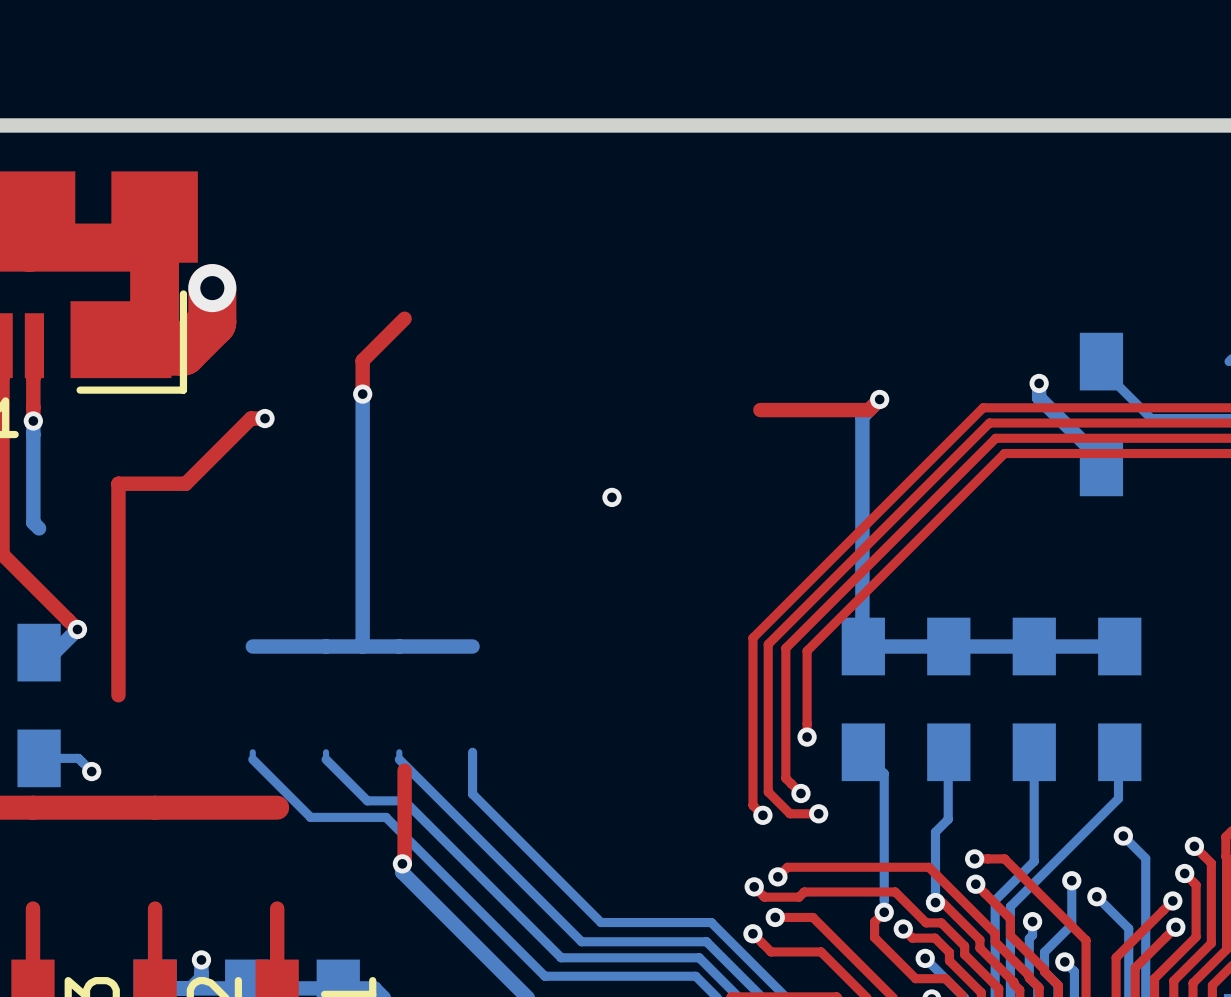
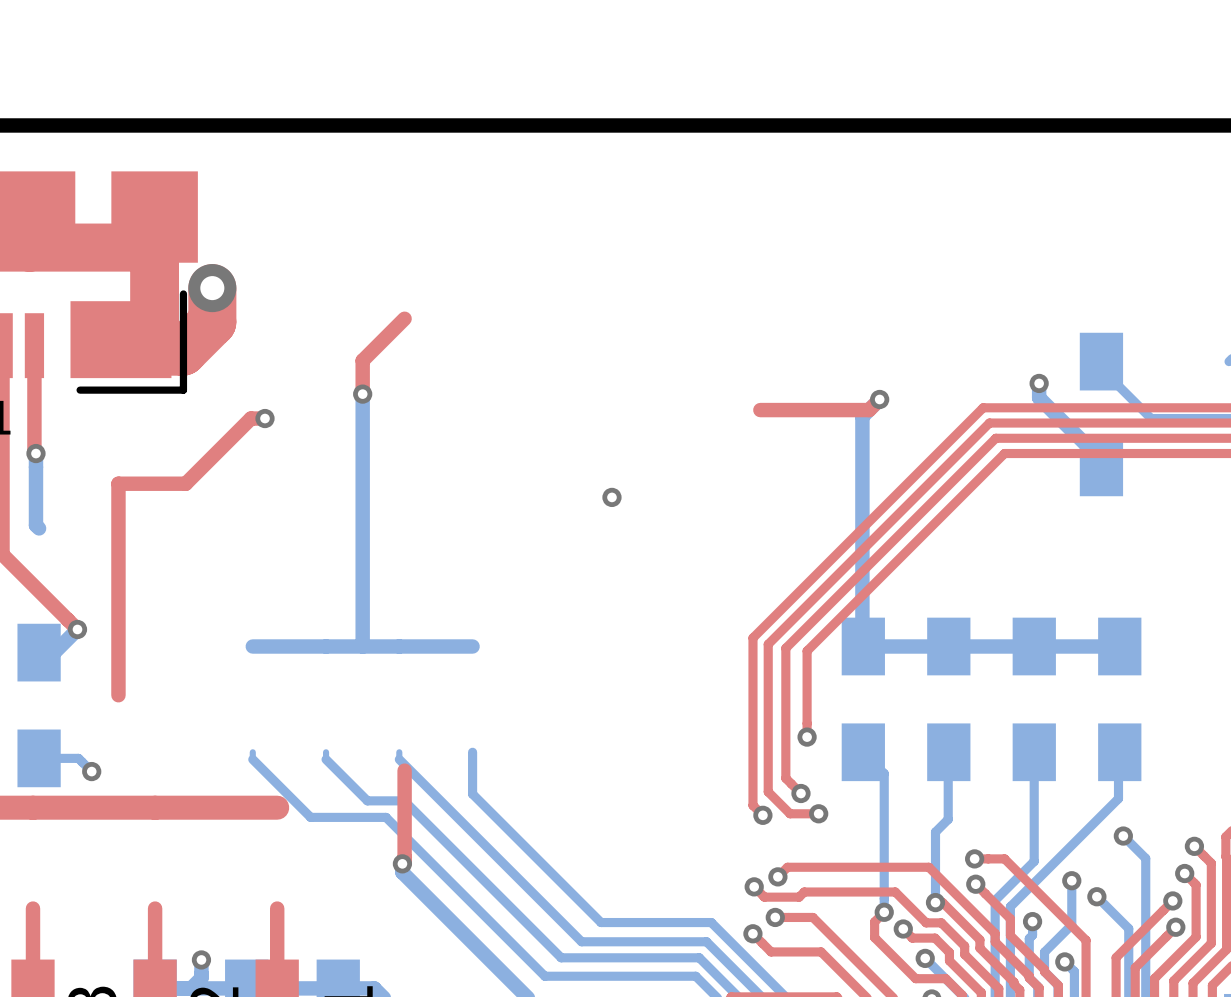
top track: (34, 376) (33, 420) -> (34, 376) (34, 452) (35, 453)
bottom track: (33, 420) (33, 522) (35, 525) -> (35, 453) (35, 525)
via position: (33, 420) -> (35, 453)

